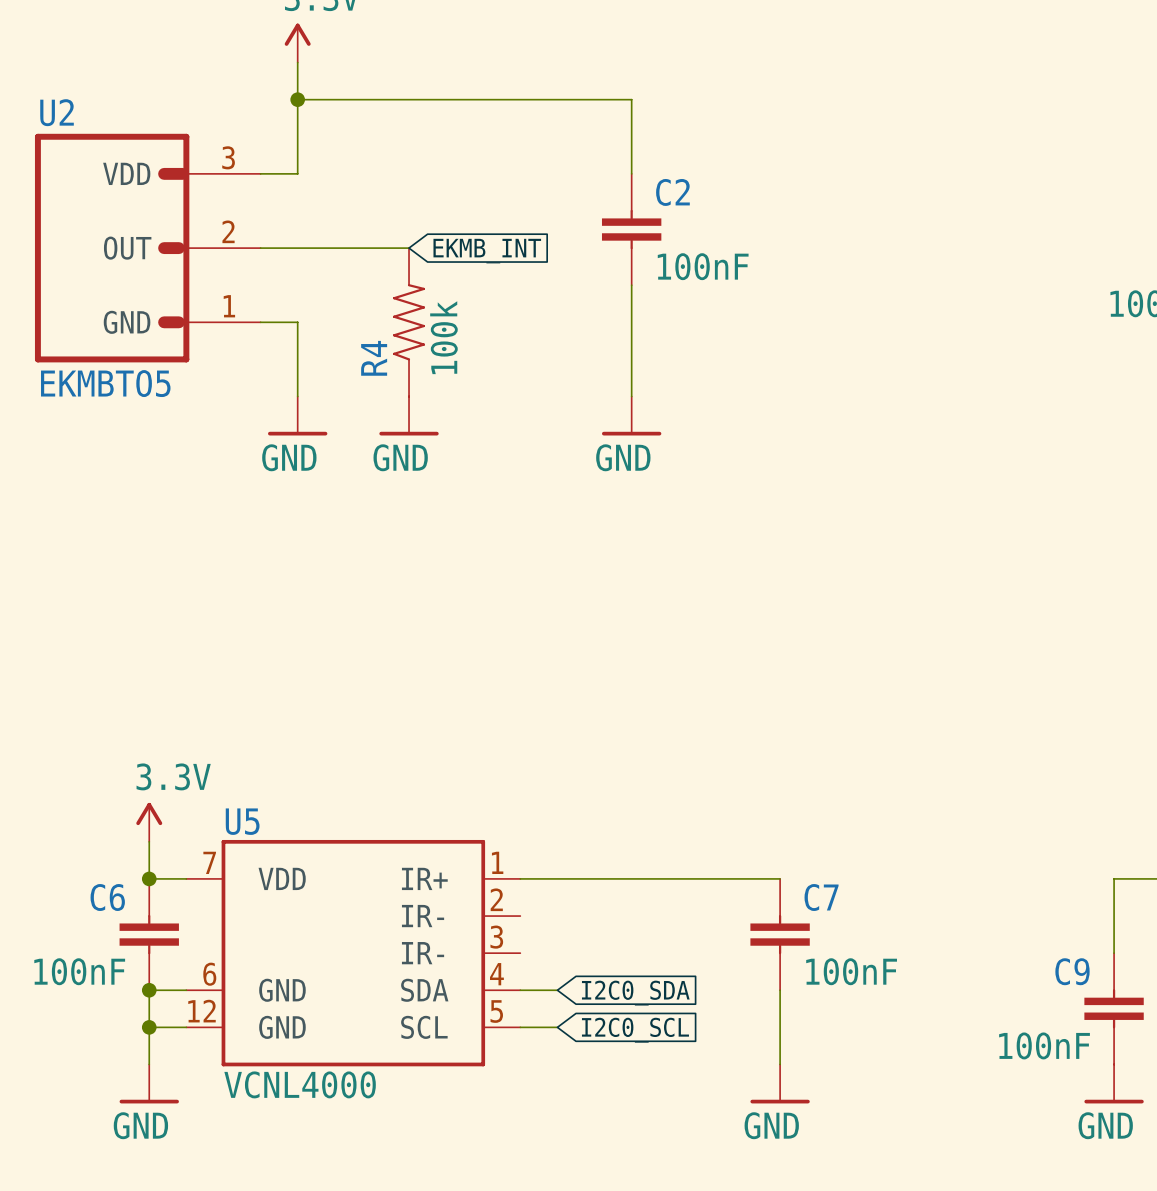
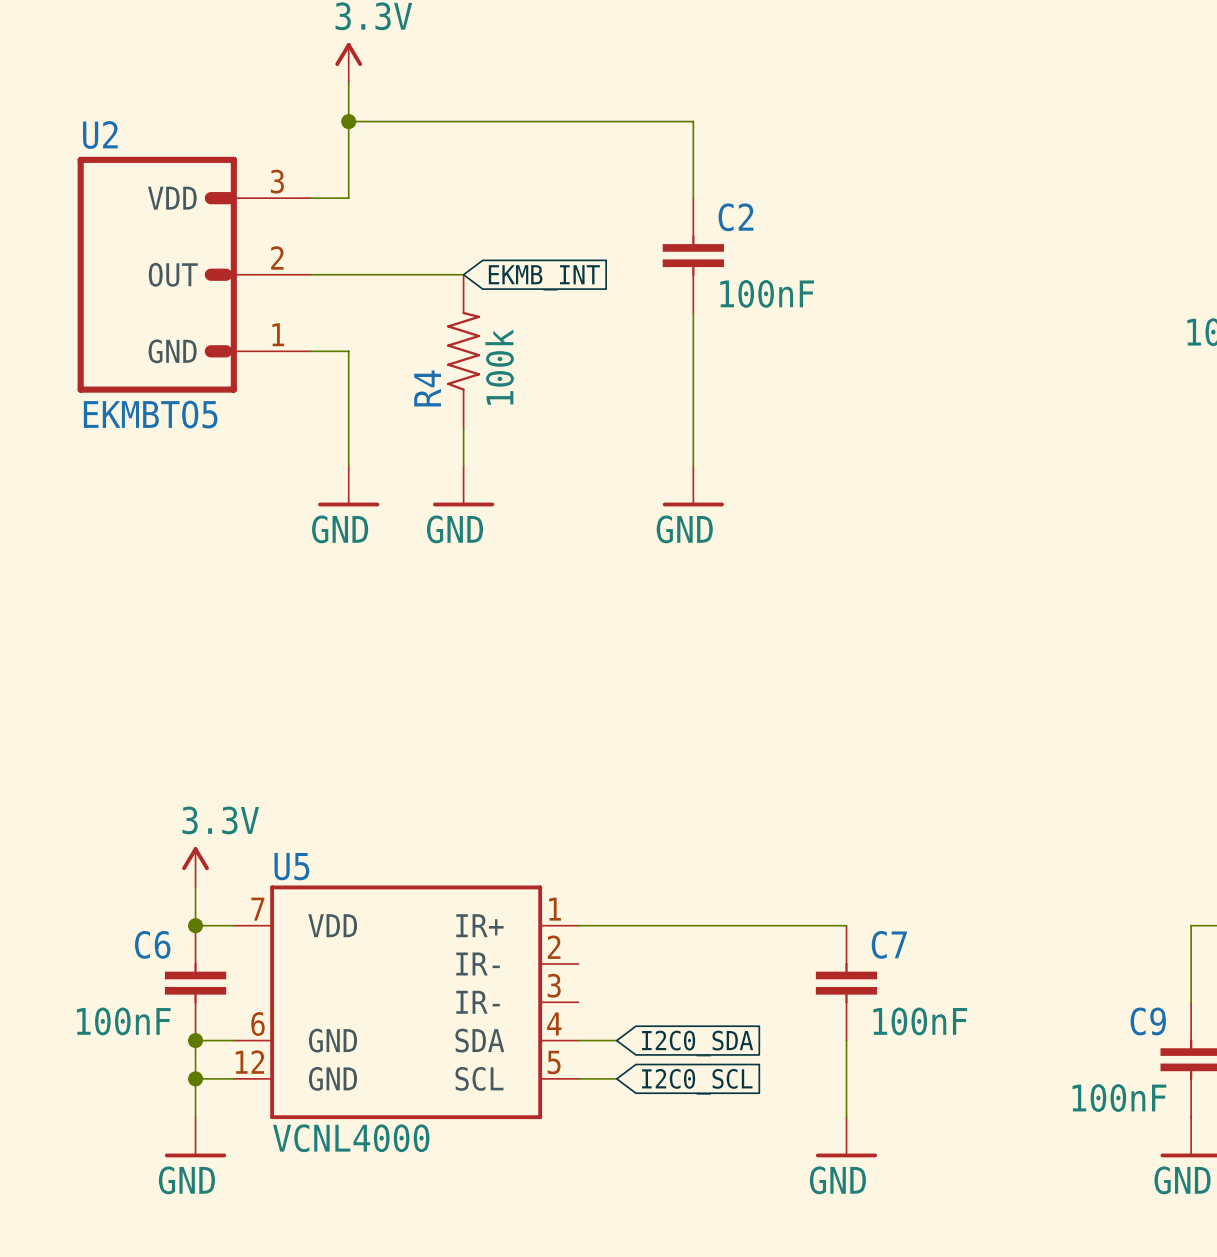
power symbol position: GND (297, 416) -> GND (348, 486)
power symbol position: GND (409, 416) -> GND (463, 486)
power symbol position: GND (631, 416) -> GND (693, 486)

